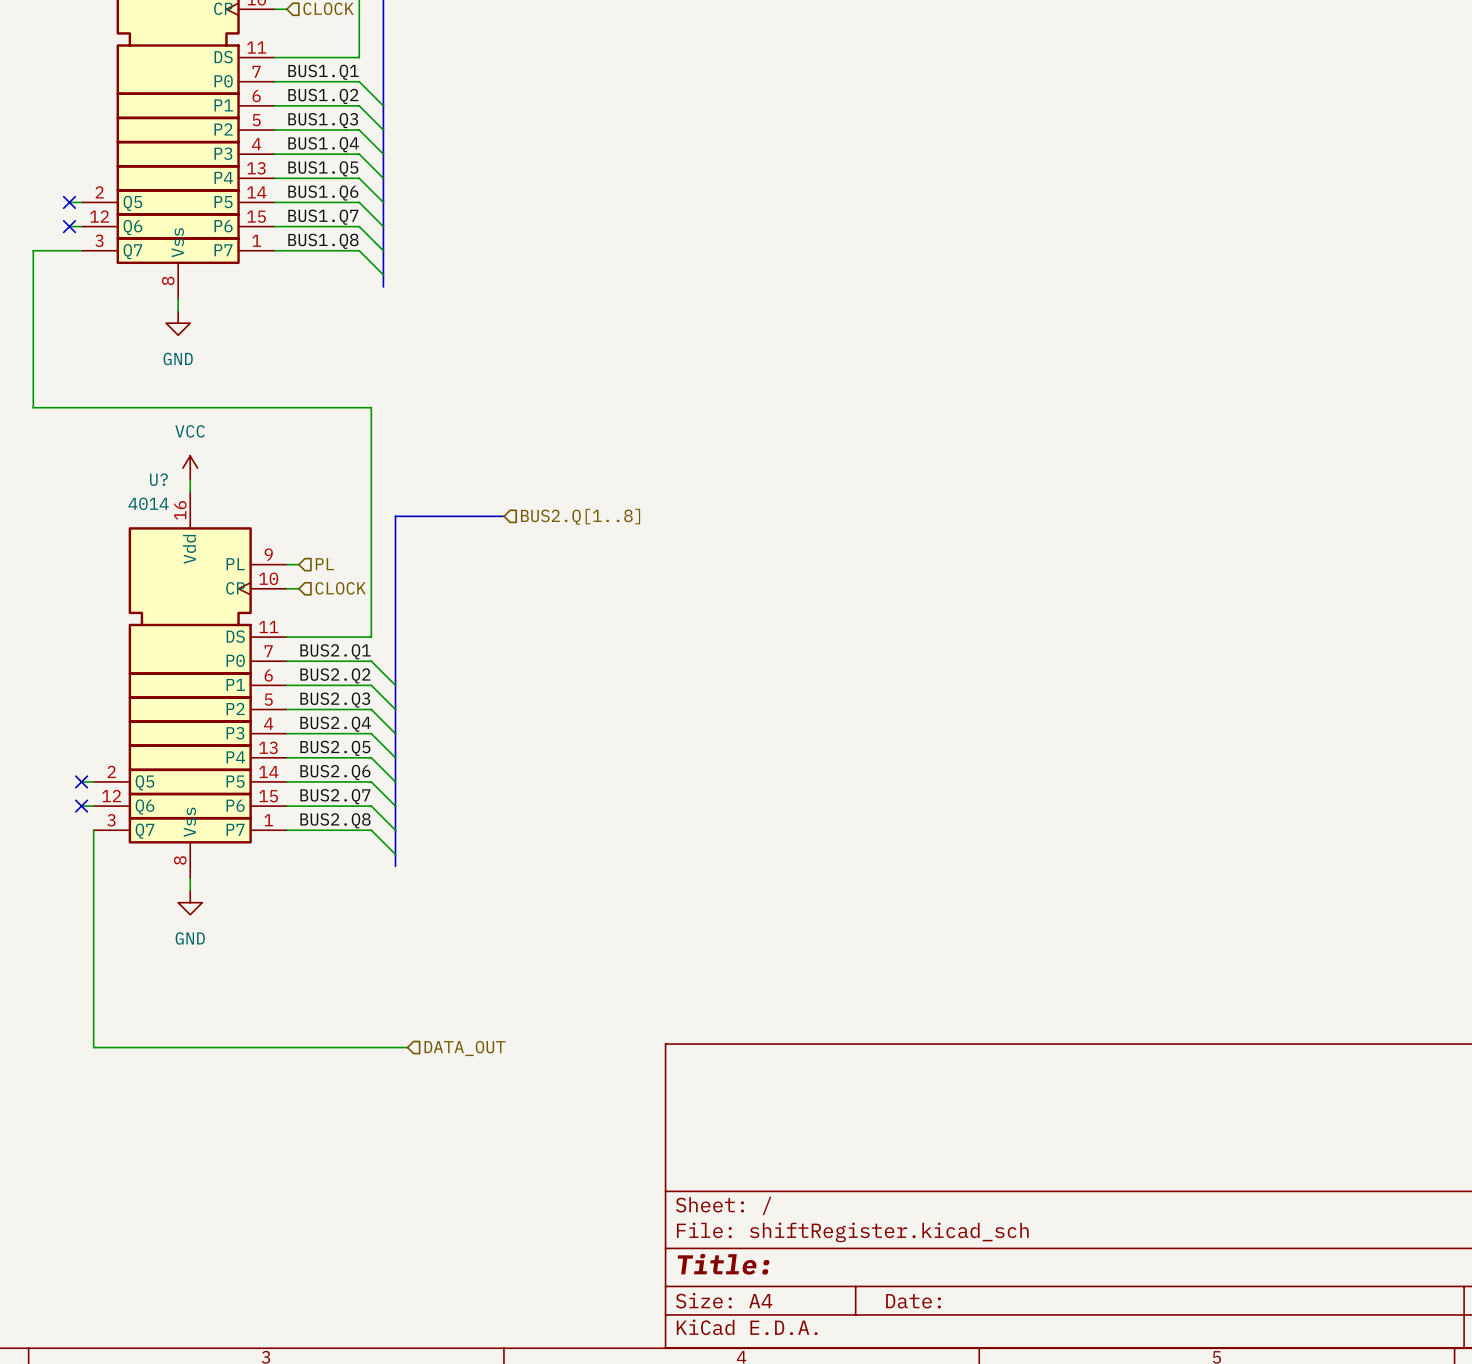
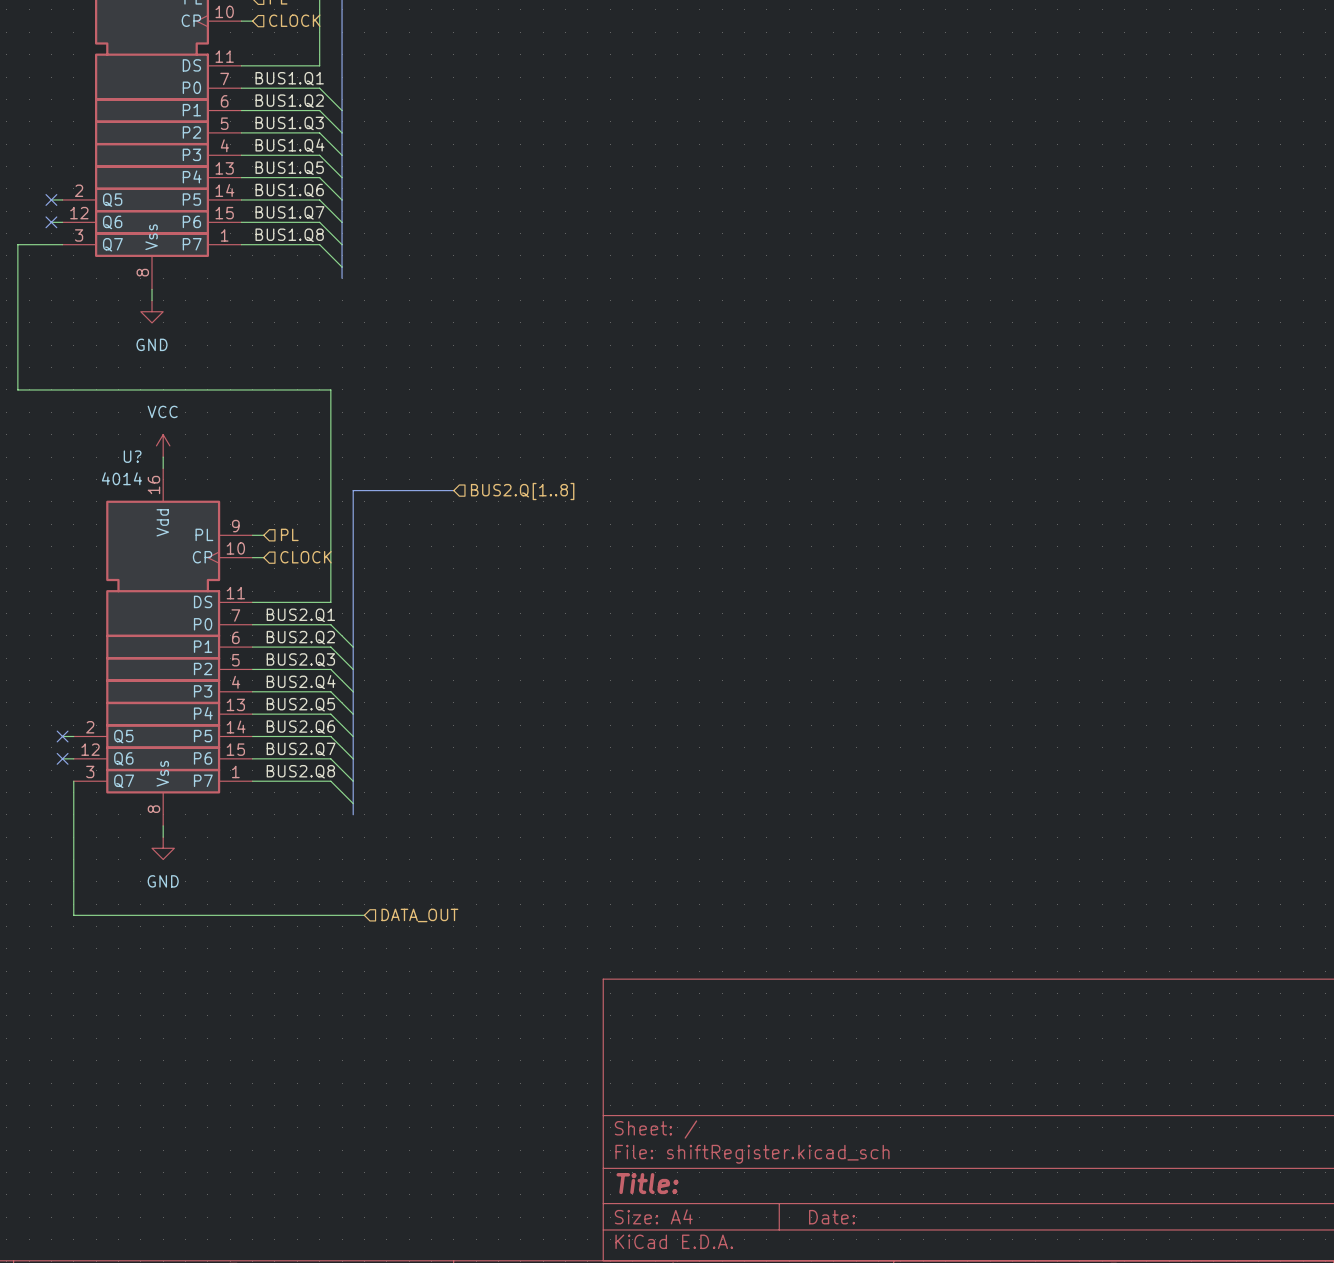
wire: (93, 975) (93, 1047) (407, 1047) -> (73, 915) (364, 915)
hierarchical label position: DATA_OUT (465, 1048) -> DATA_OUT (419, 915)

